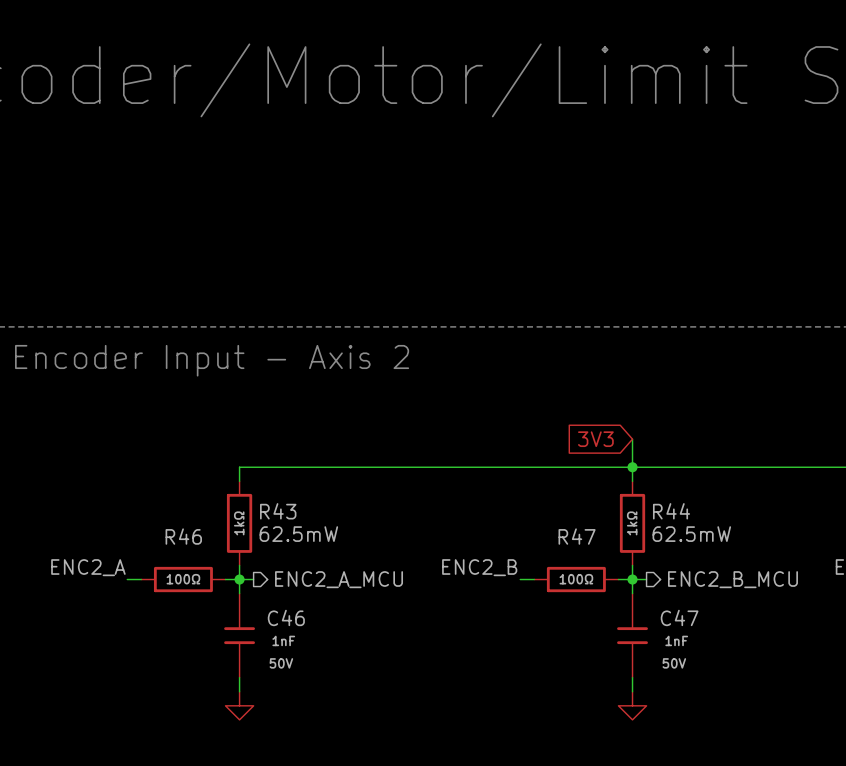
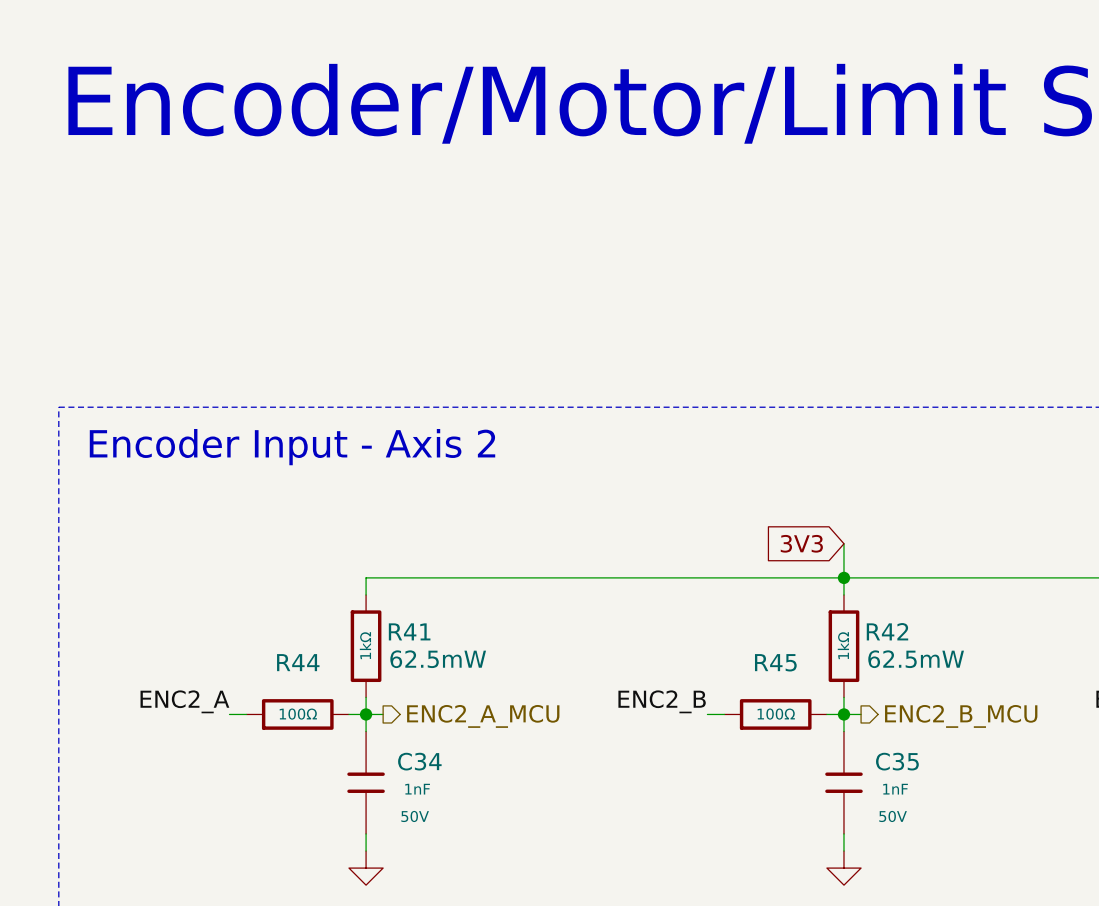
R43 name: R43 (278, 511) -> R41 (409, 631)
R44 name: R44 (671, 511) -> R42 (887, 631)
R46 name: R46 (183, 536) -> R44 (298, 662)
R47 name: R47 (577, 536) -> R45 (775, 662)
C46 name: C46 (286, 617) -> C34 (419, 761)
C47 name: C47 (679, 617) -> C35 (897, 761)

